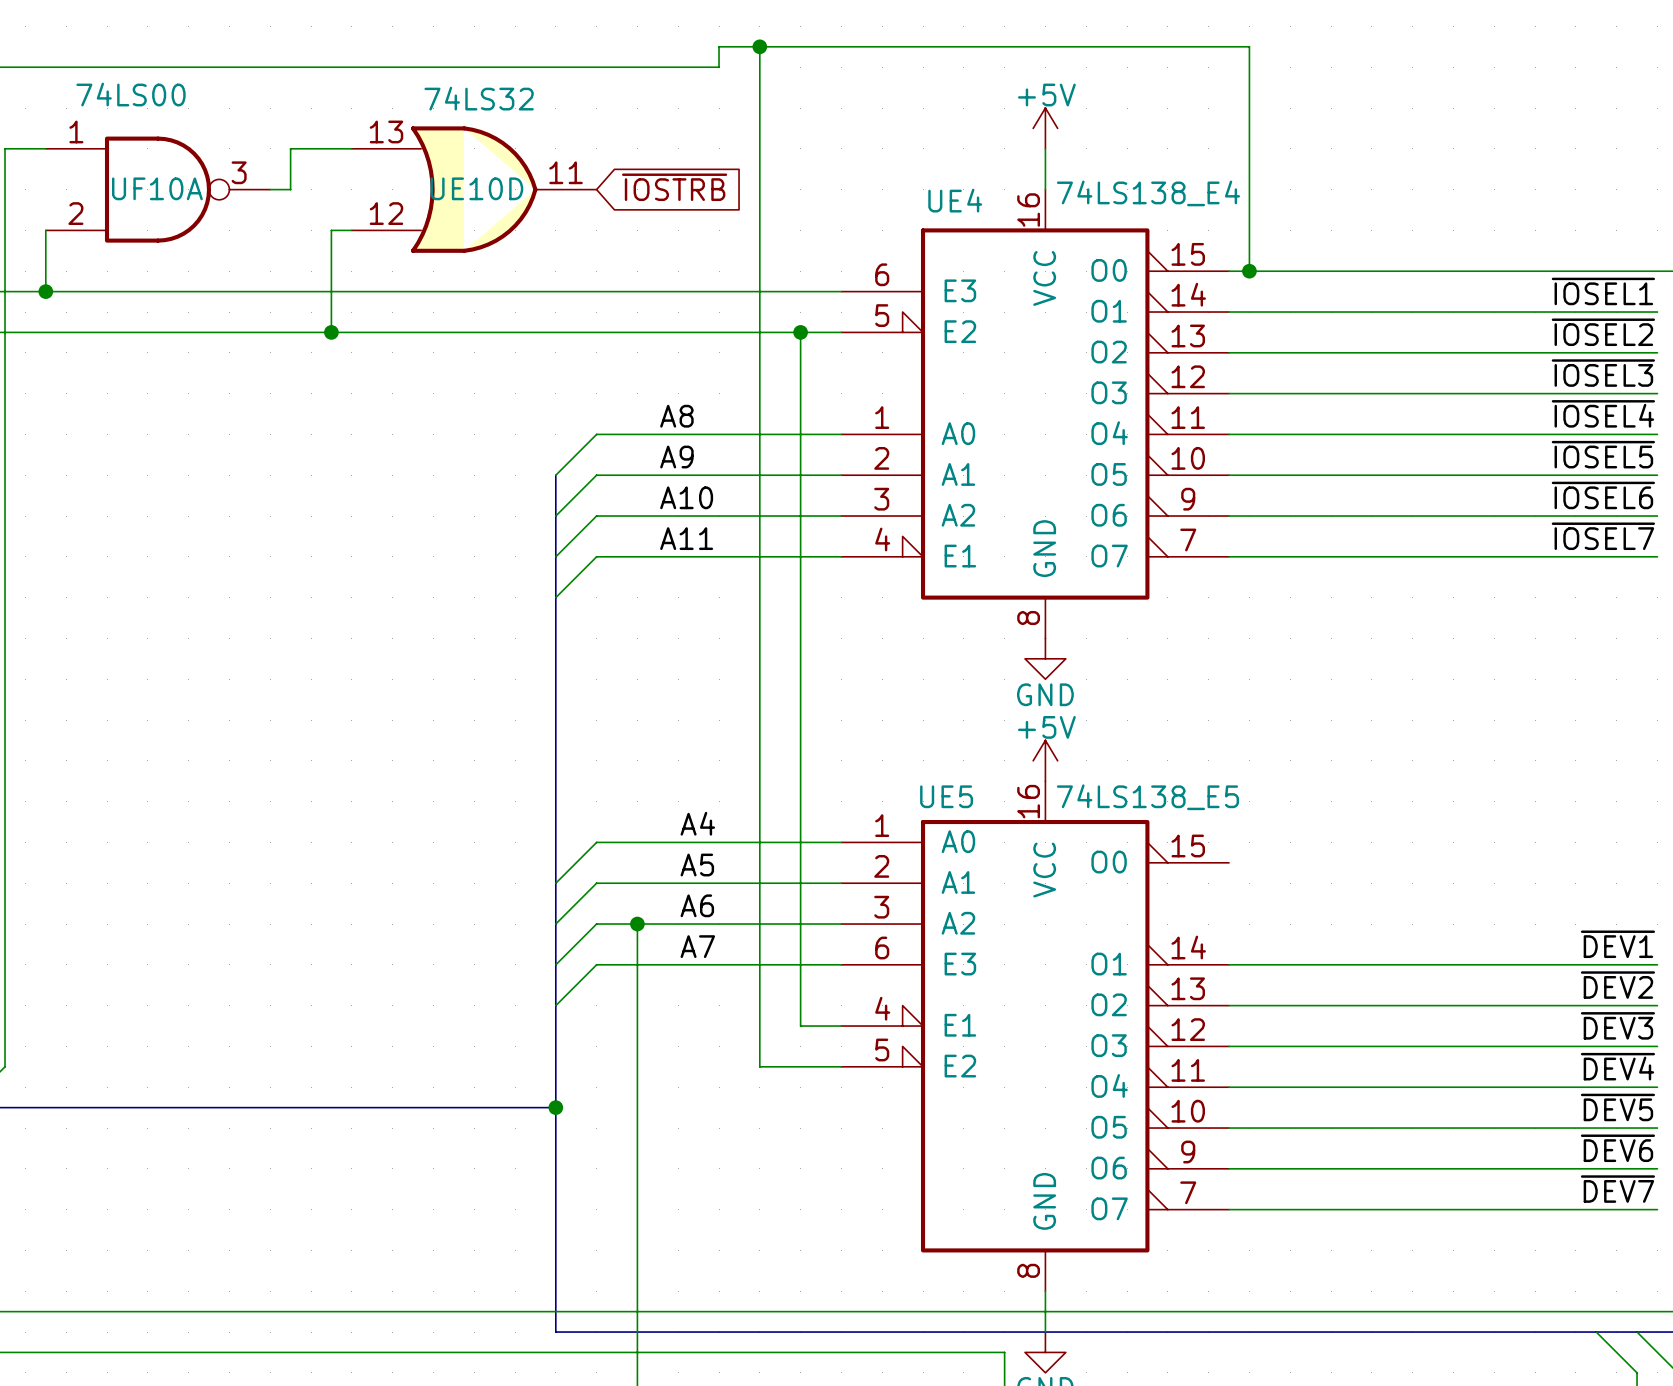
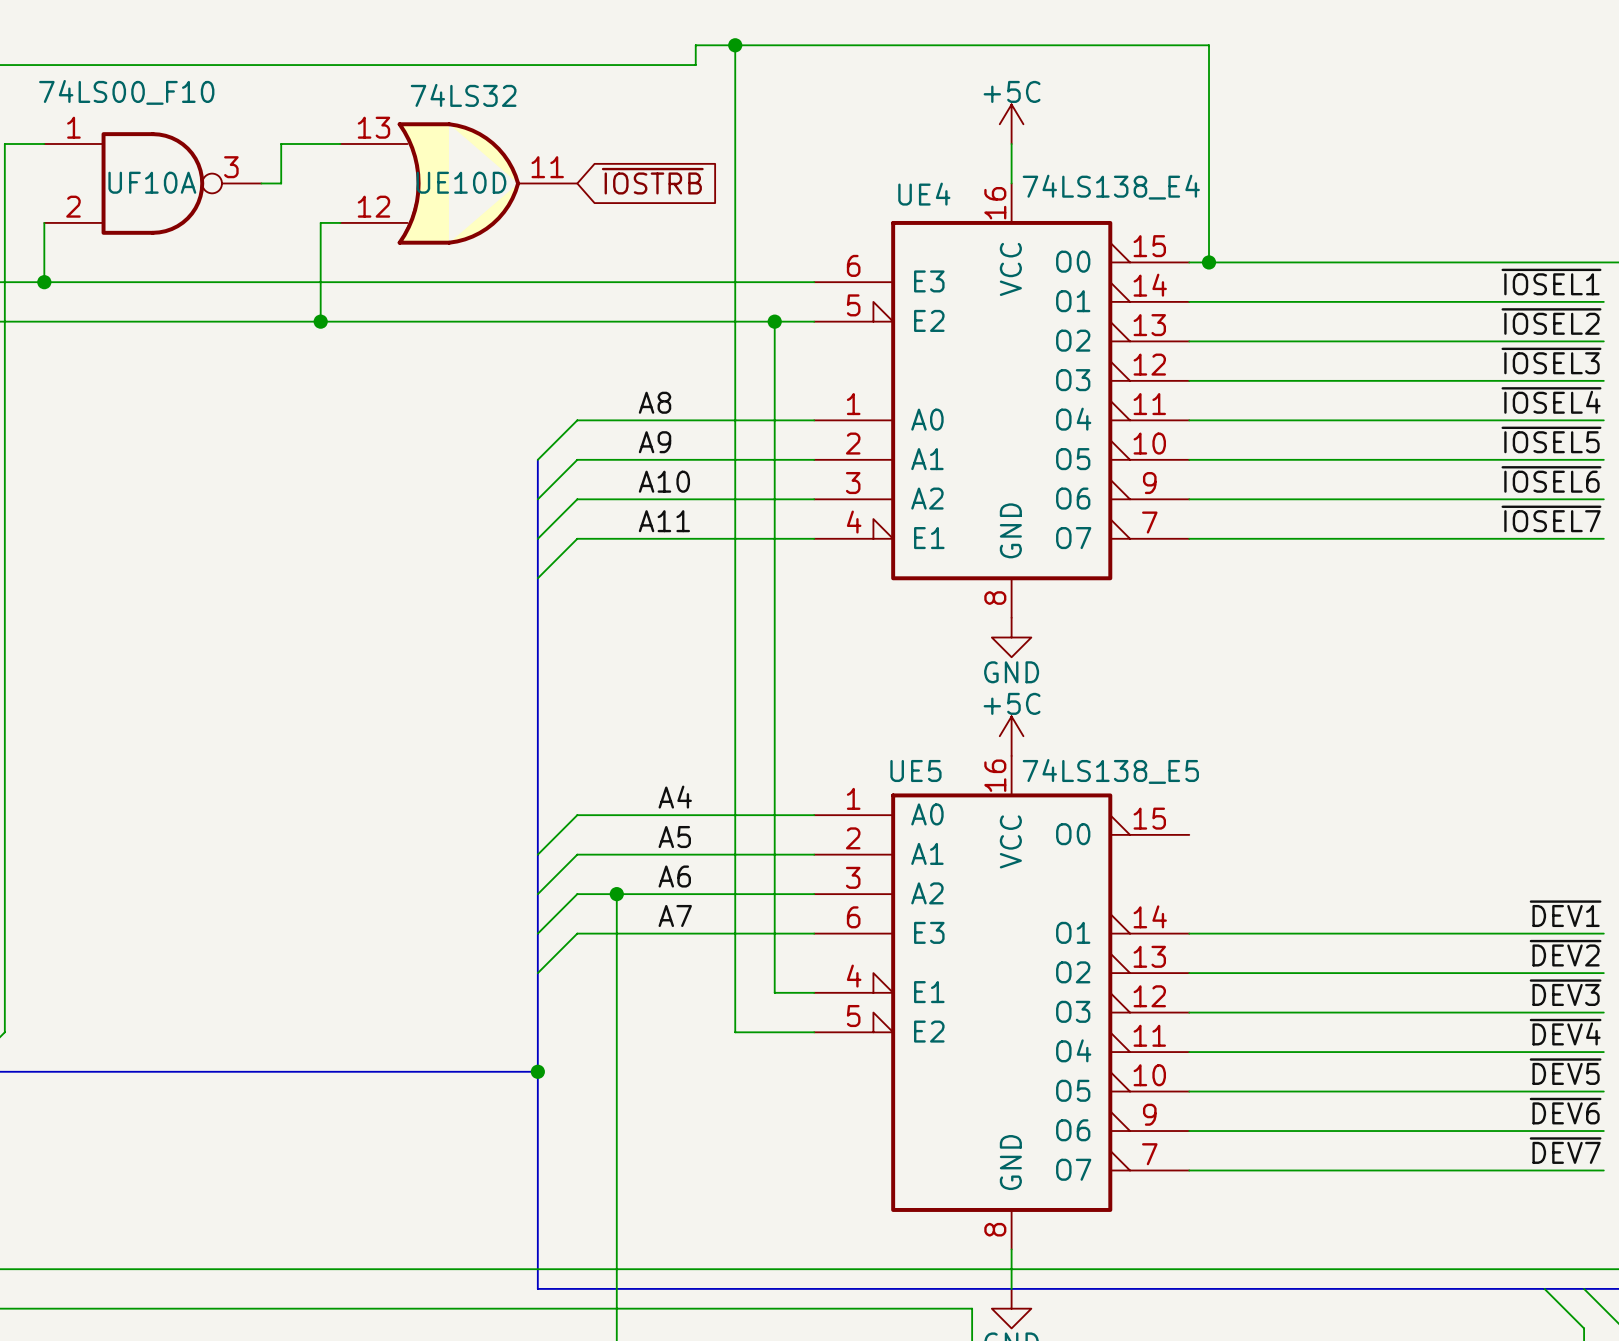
UF10A value: 74LS00 (131, 94) -> 74LS00_F10 (126, 92)
power symbol: +5V (1045, 128) -> +5C (1011, 124)
power symbol: +5V (1045, 760) -> +5C (1011, 736)

